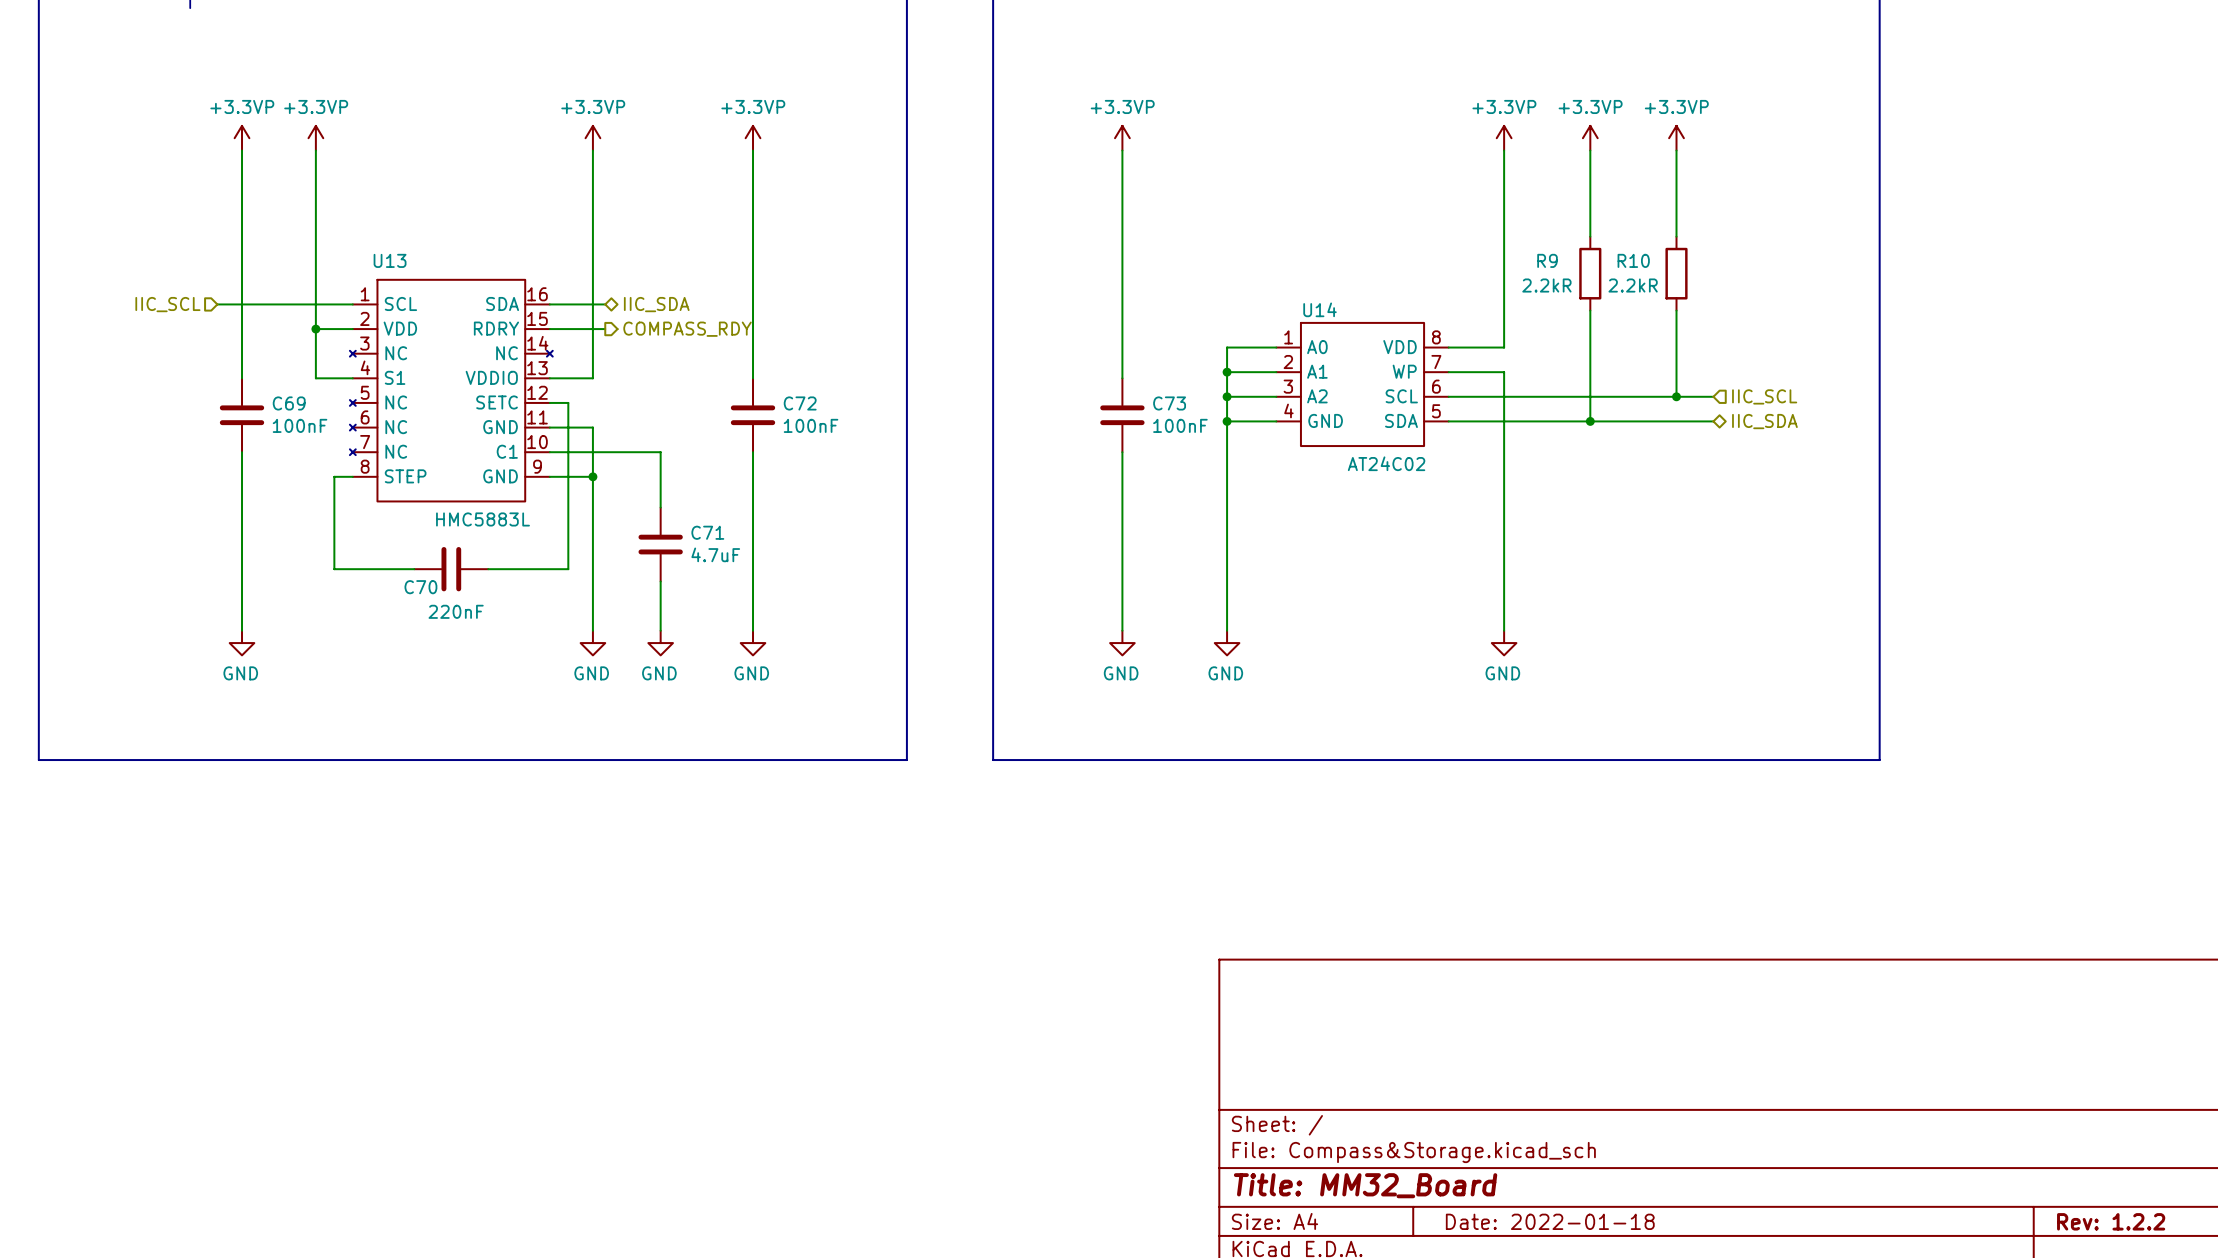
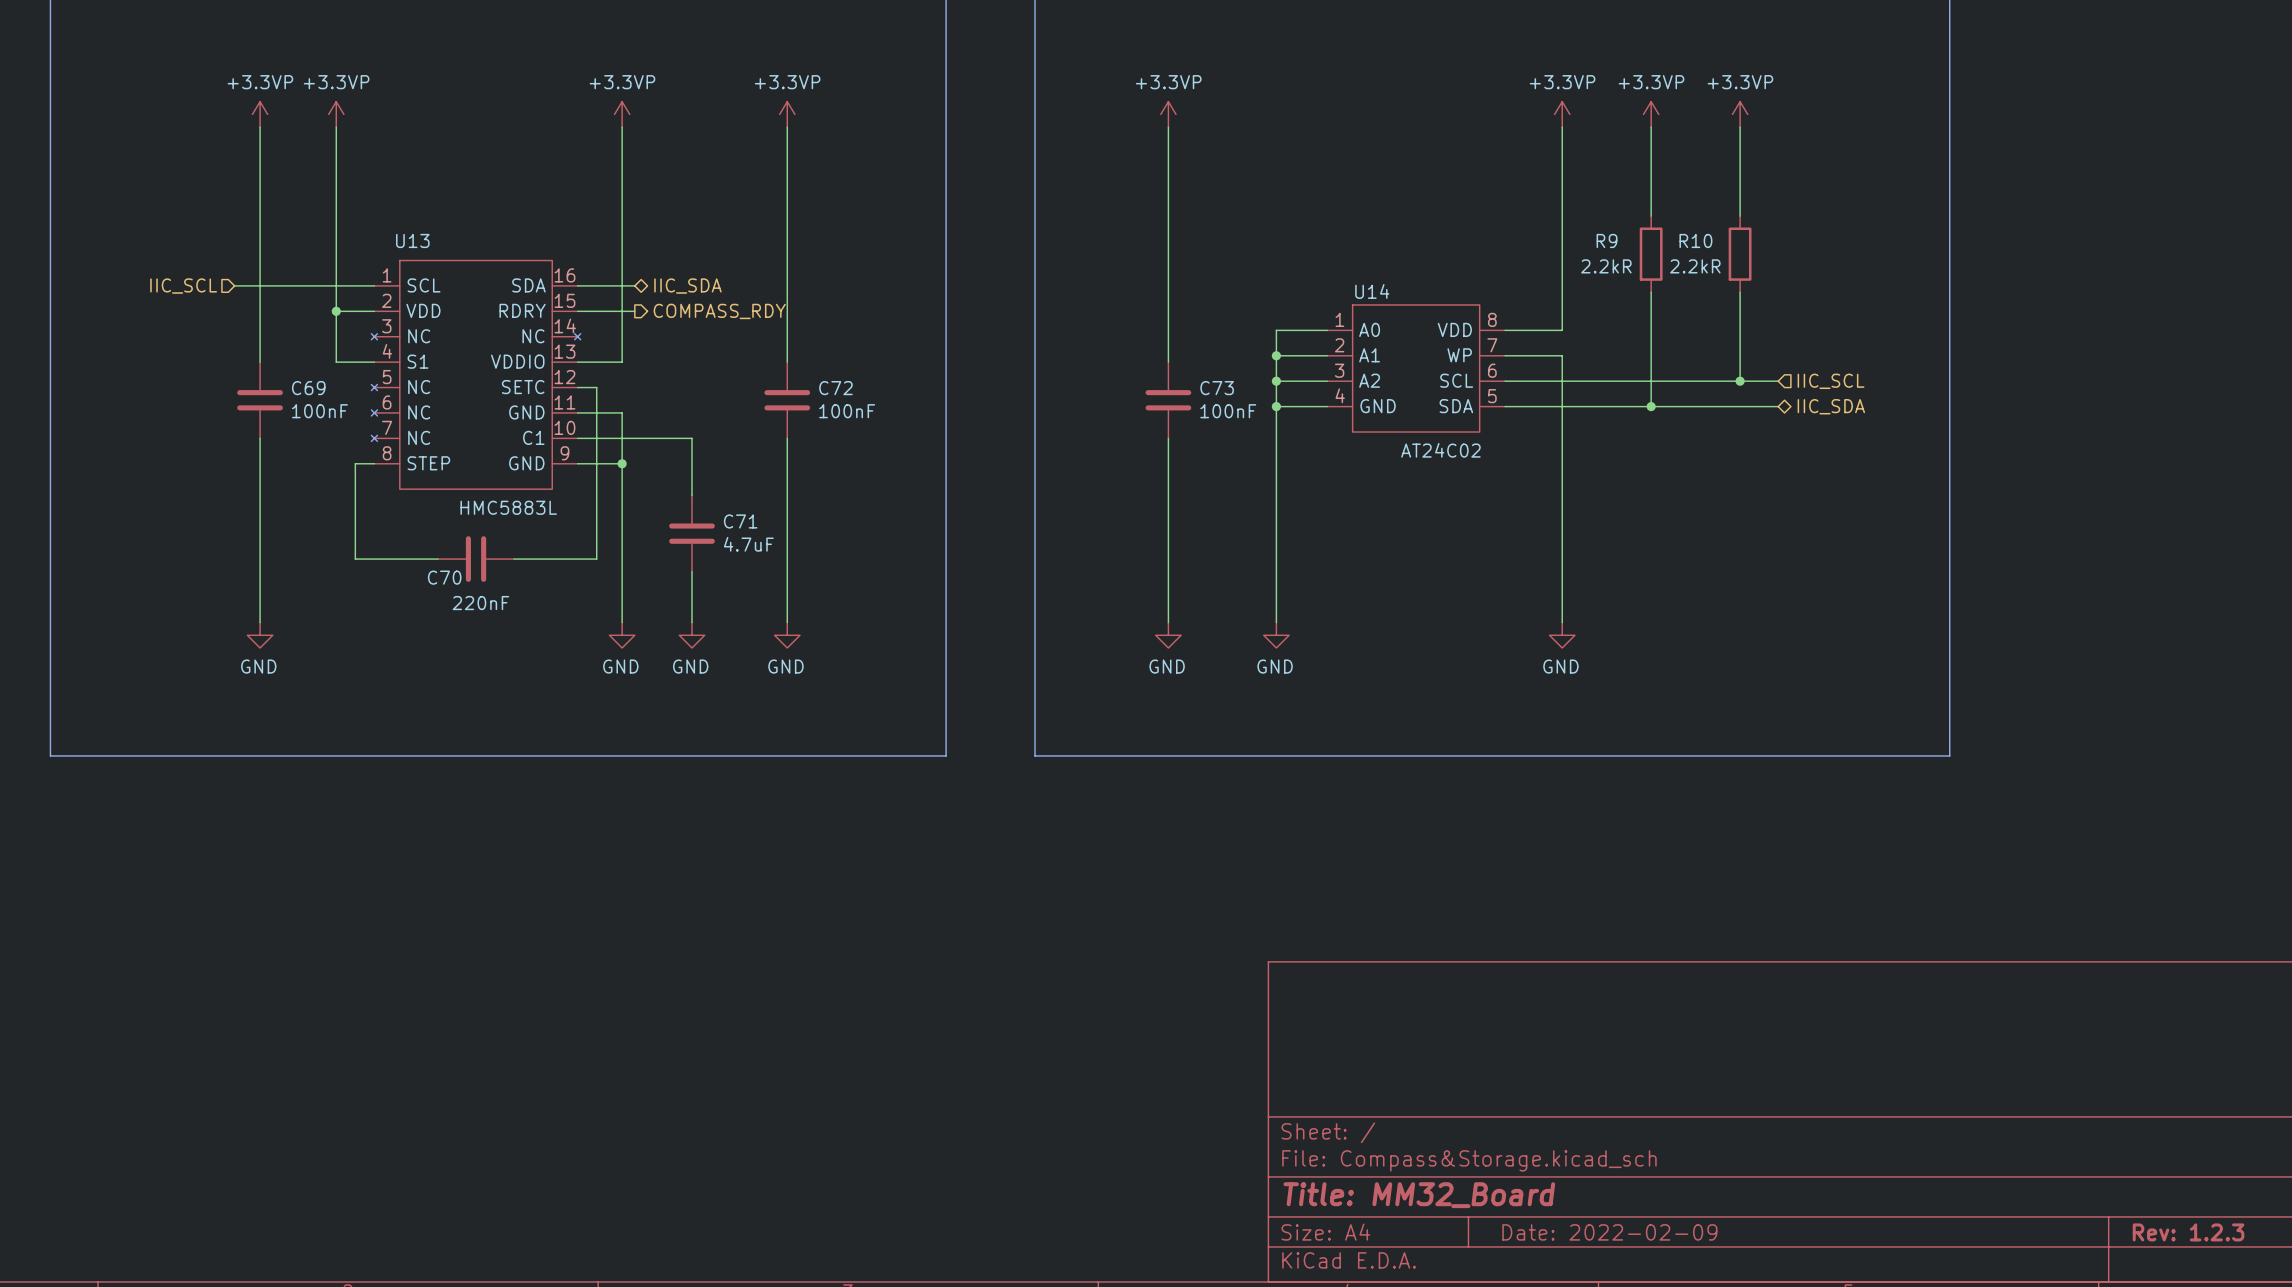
title block: Date: 2022-01-18 (1550, 1221) -> Date: 2022-02-09 (1609, 1232)
title block: Rev: 1.2.2 (2111, 1221) -> Rev: 1.2.3 (2188, 1232)

